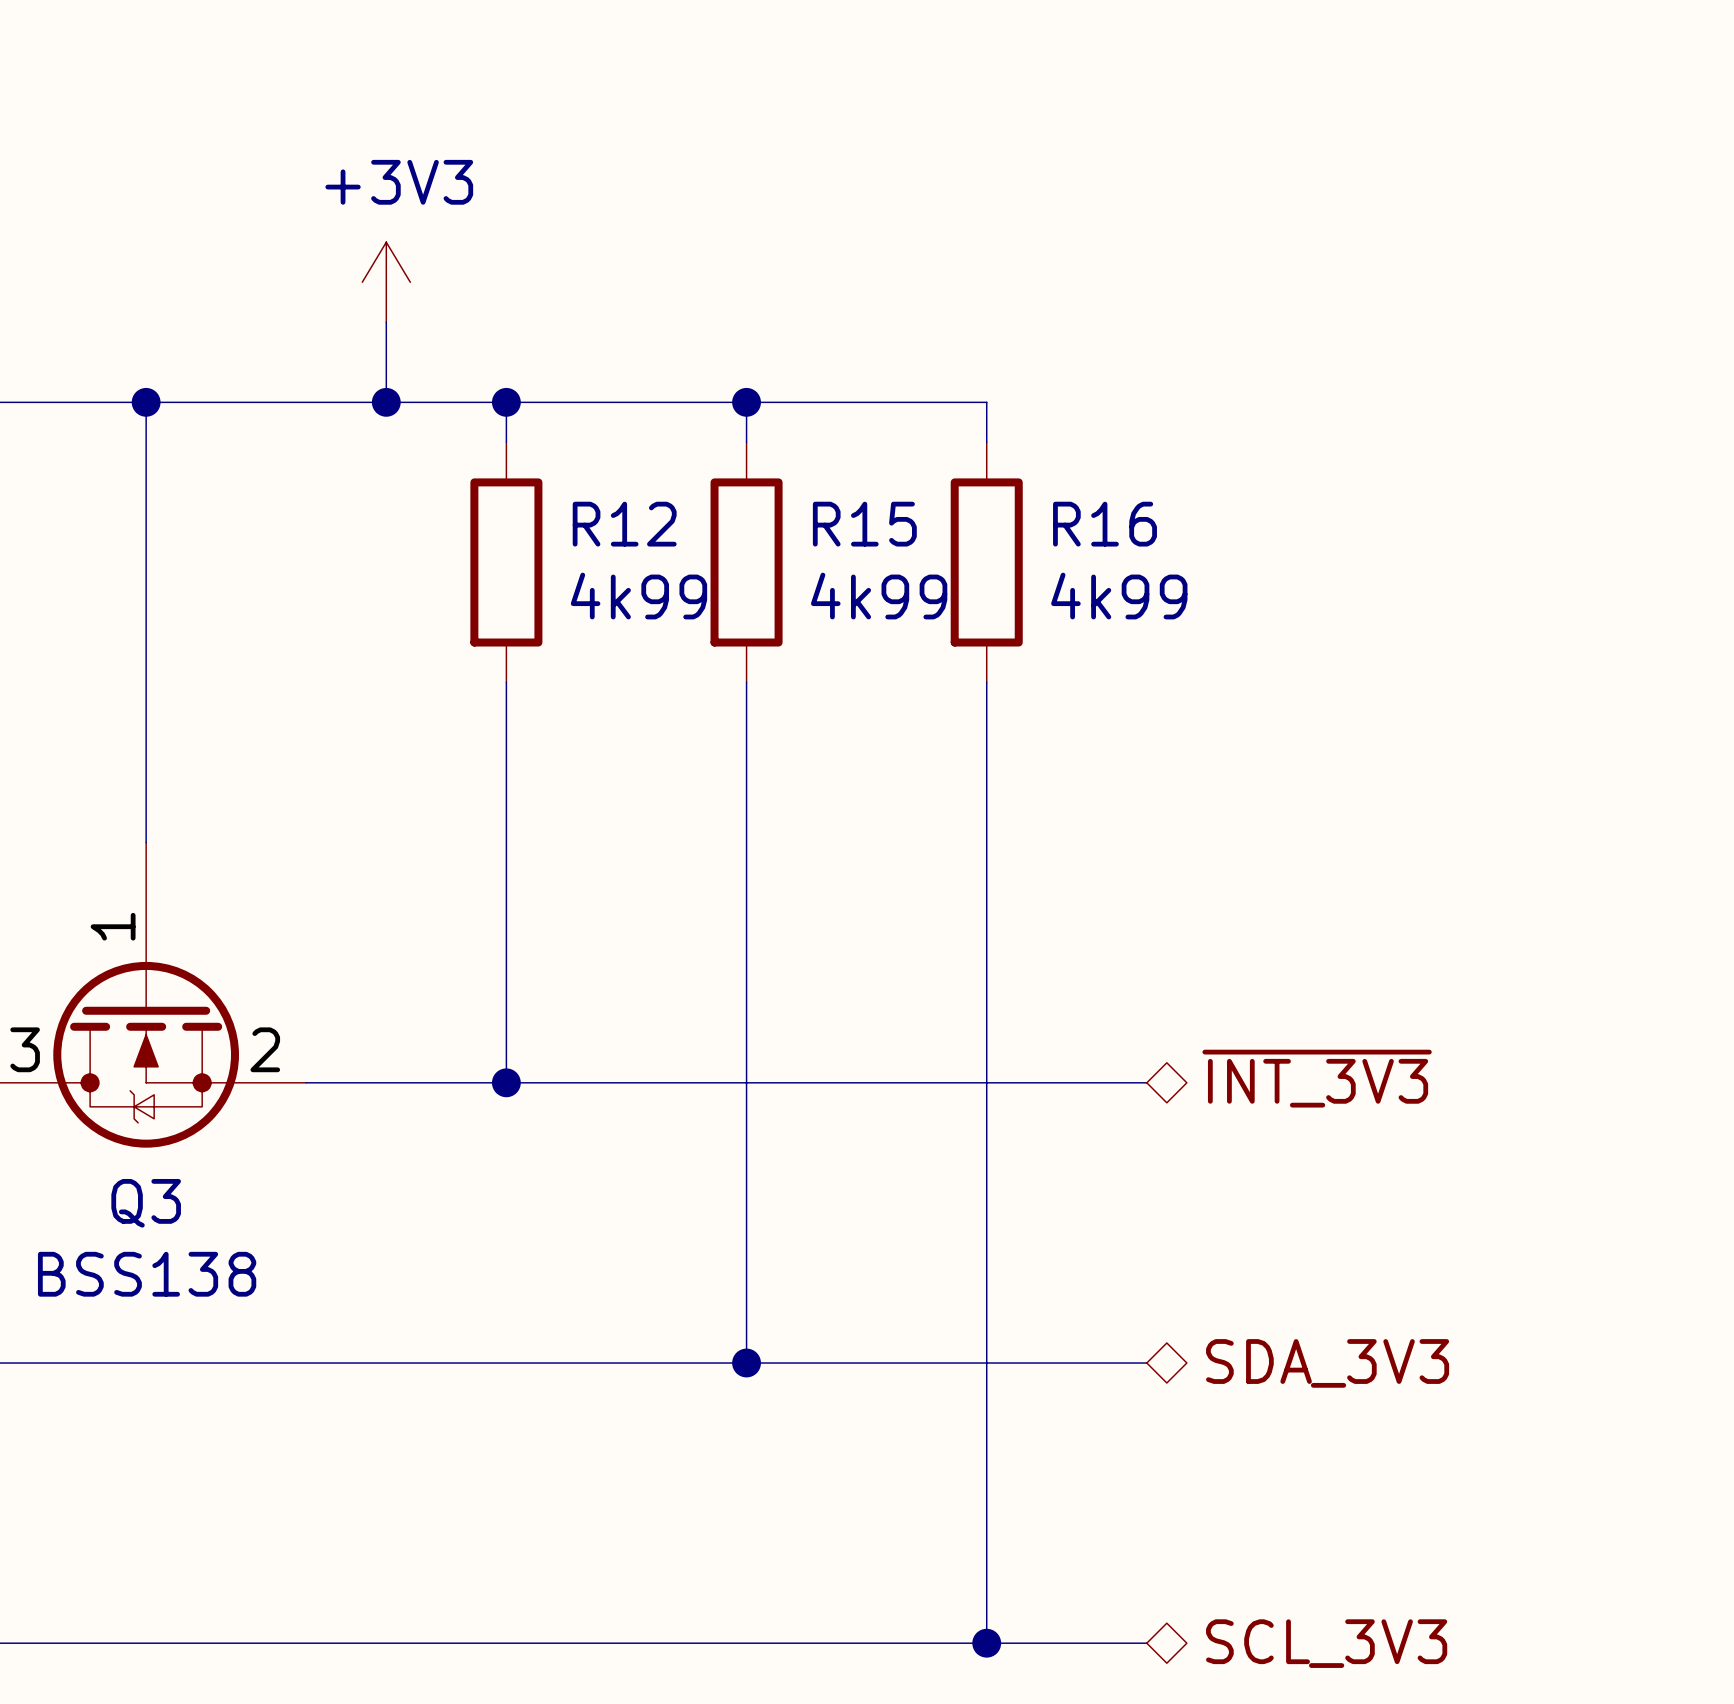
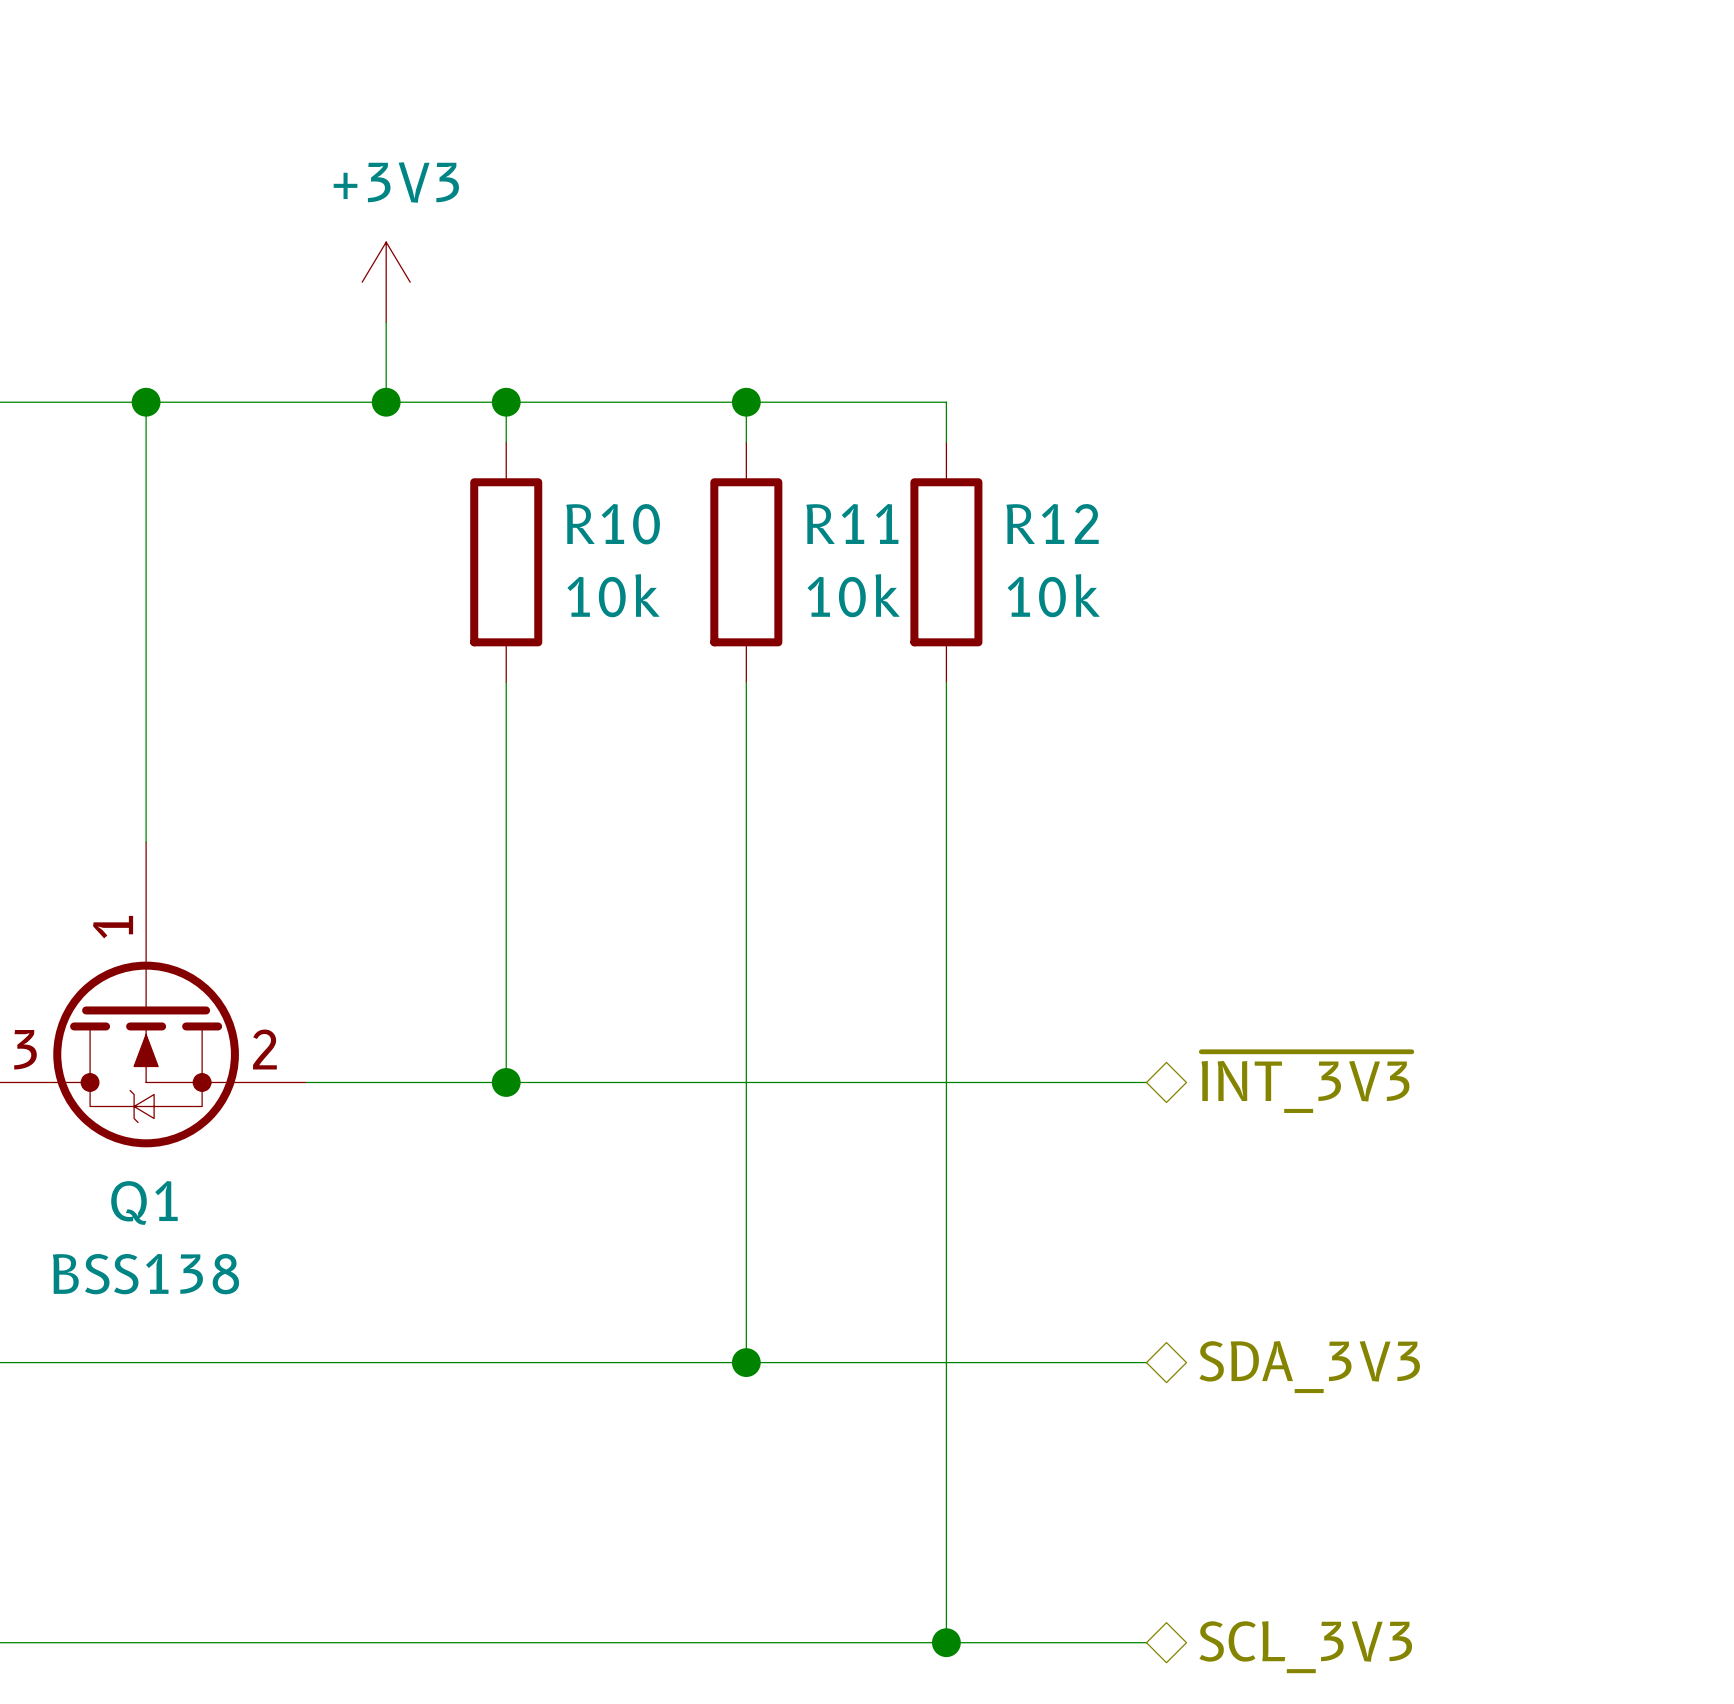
wire: (946, 402) (986, 402) (986, 442) -> (946, 402) (946, 442)
R12 name: R12 (624, 524) -> R10 (613, 524)
R15 name: R15 (864, 524) -> R11 (852, 523)
R12: none -> 10k (946, 562)
R16: 4k99 (986, 562) -> none
R12 value: 4k99 (638, 596) -> 10k (613, 595)
R15 value: 4k99 (879, 596) -> 10k (853, 595)
wire: (986, 682) (986, 1643) -> (946, 682) (946, 1642)
Q3 name: Q3 (146, 1203) -> Q1 (144, 1202)
junction position: (986, 1643) -> (946, 1642)

